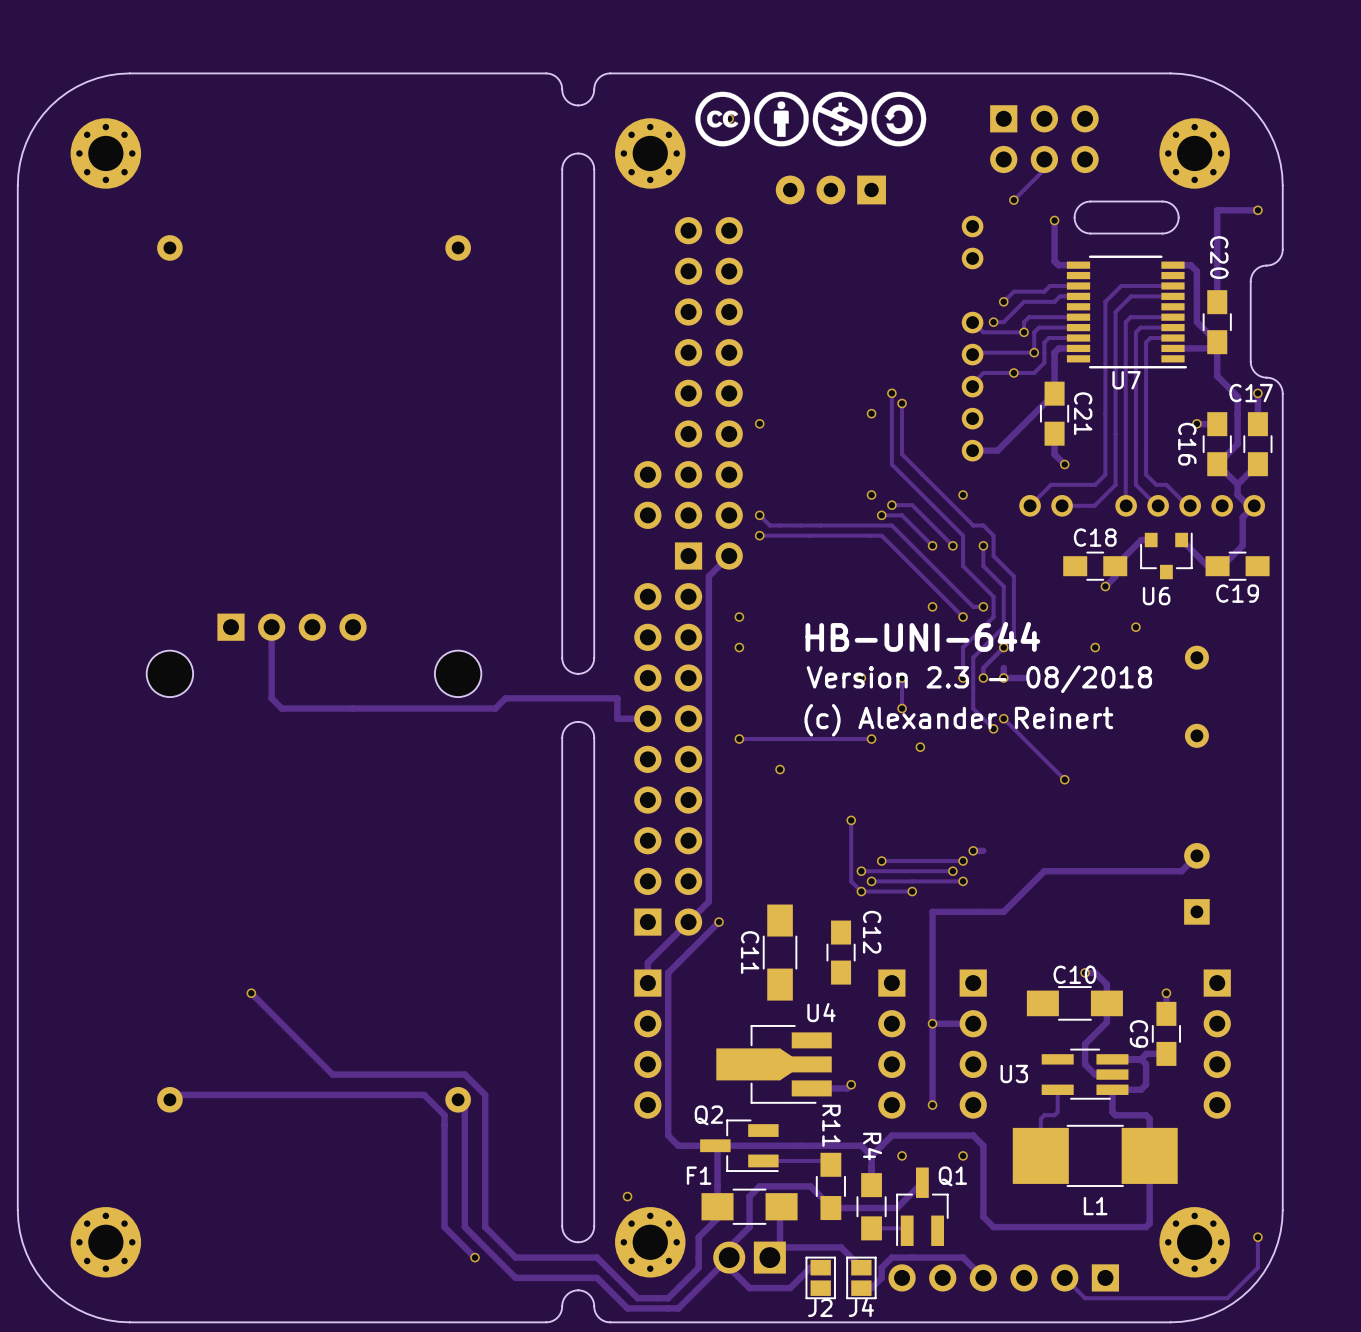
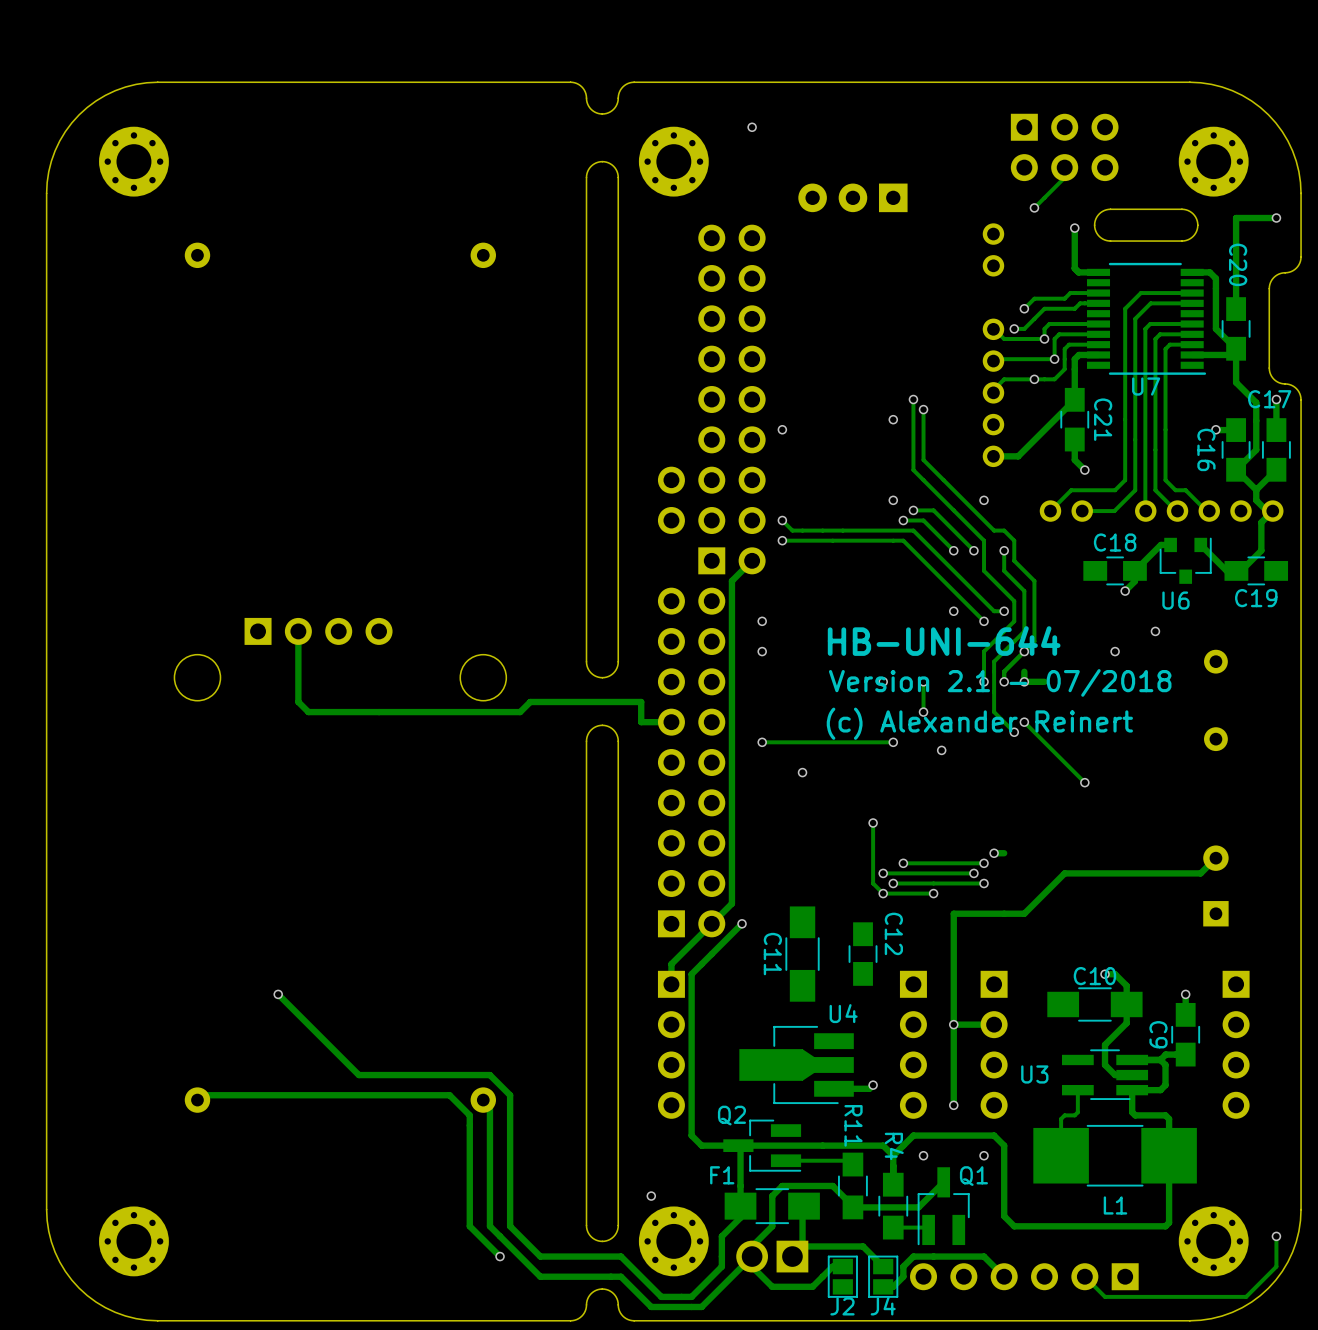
drawing: [695, 91, 927, 147] -> none
text: Version 2.3 - 08/2018 (979, 679) -> Version 2.1 - 07/2018 (1000, 682)

